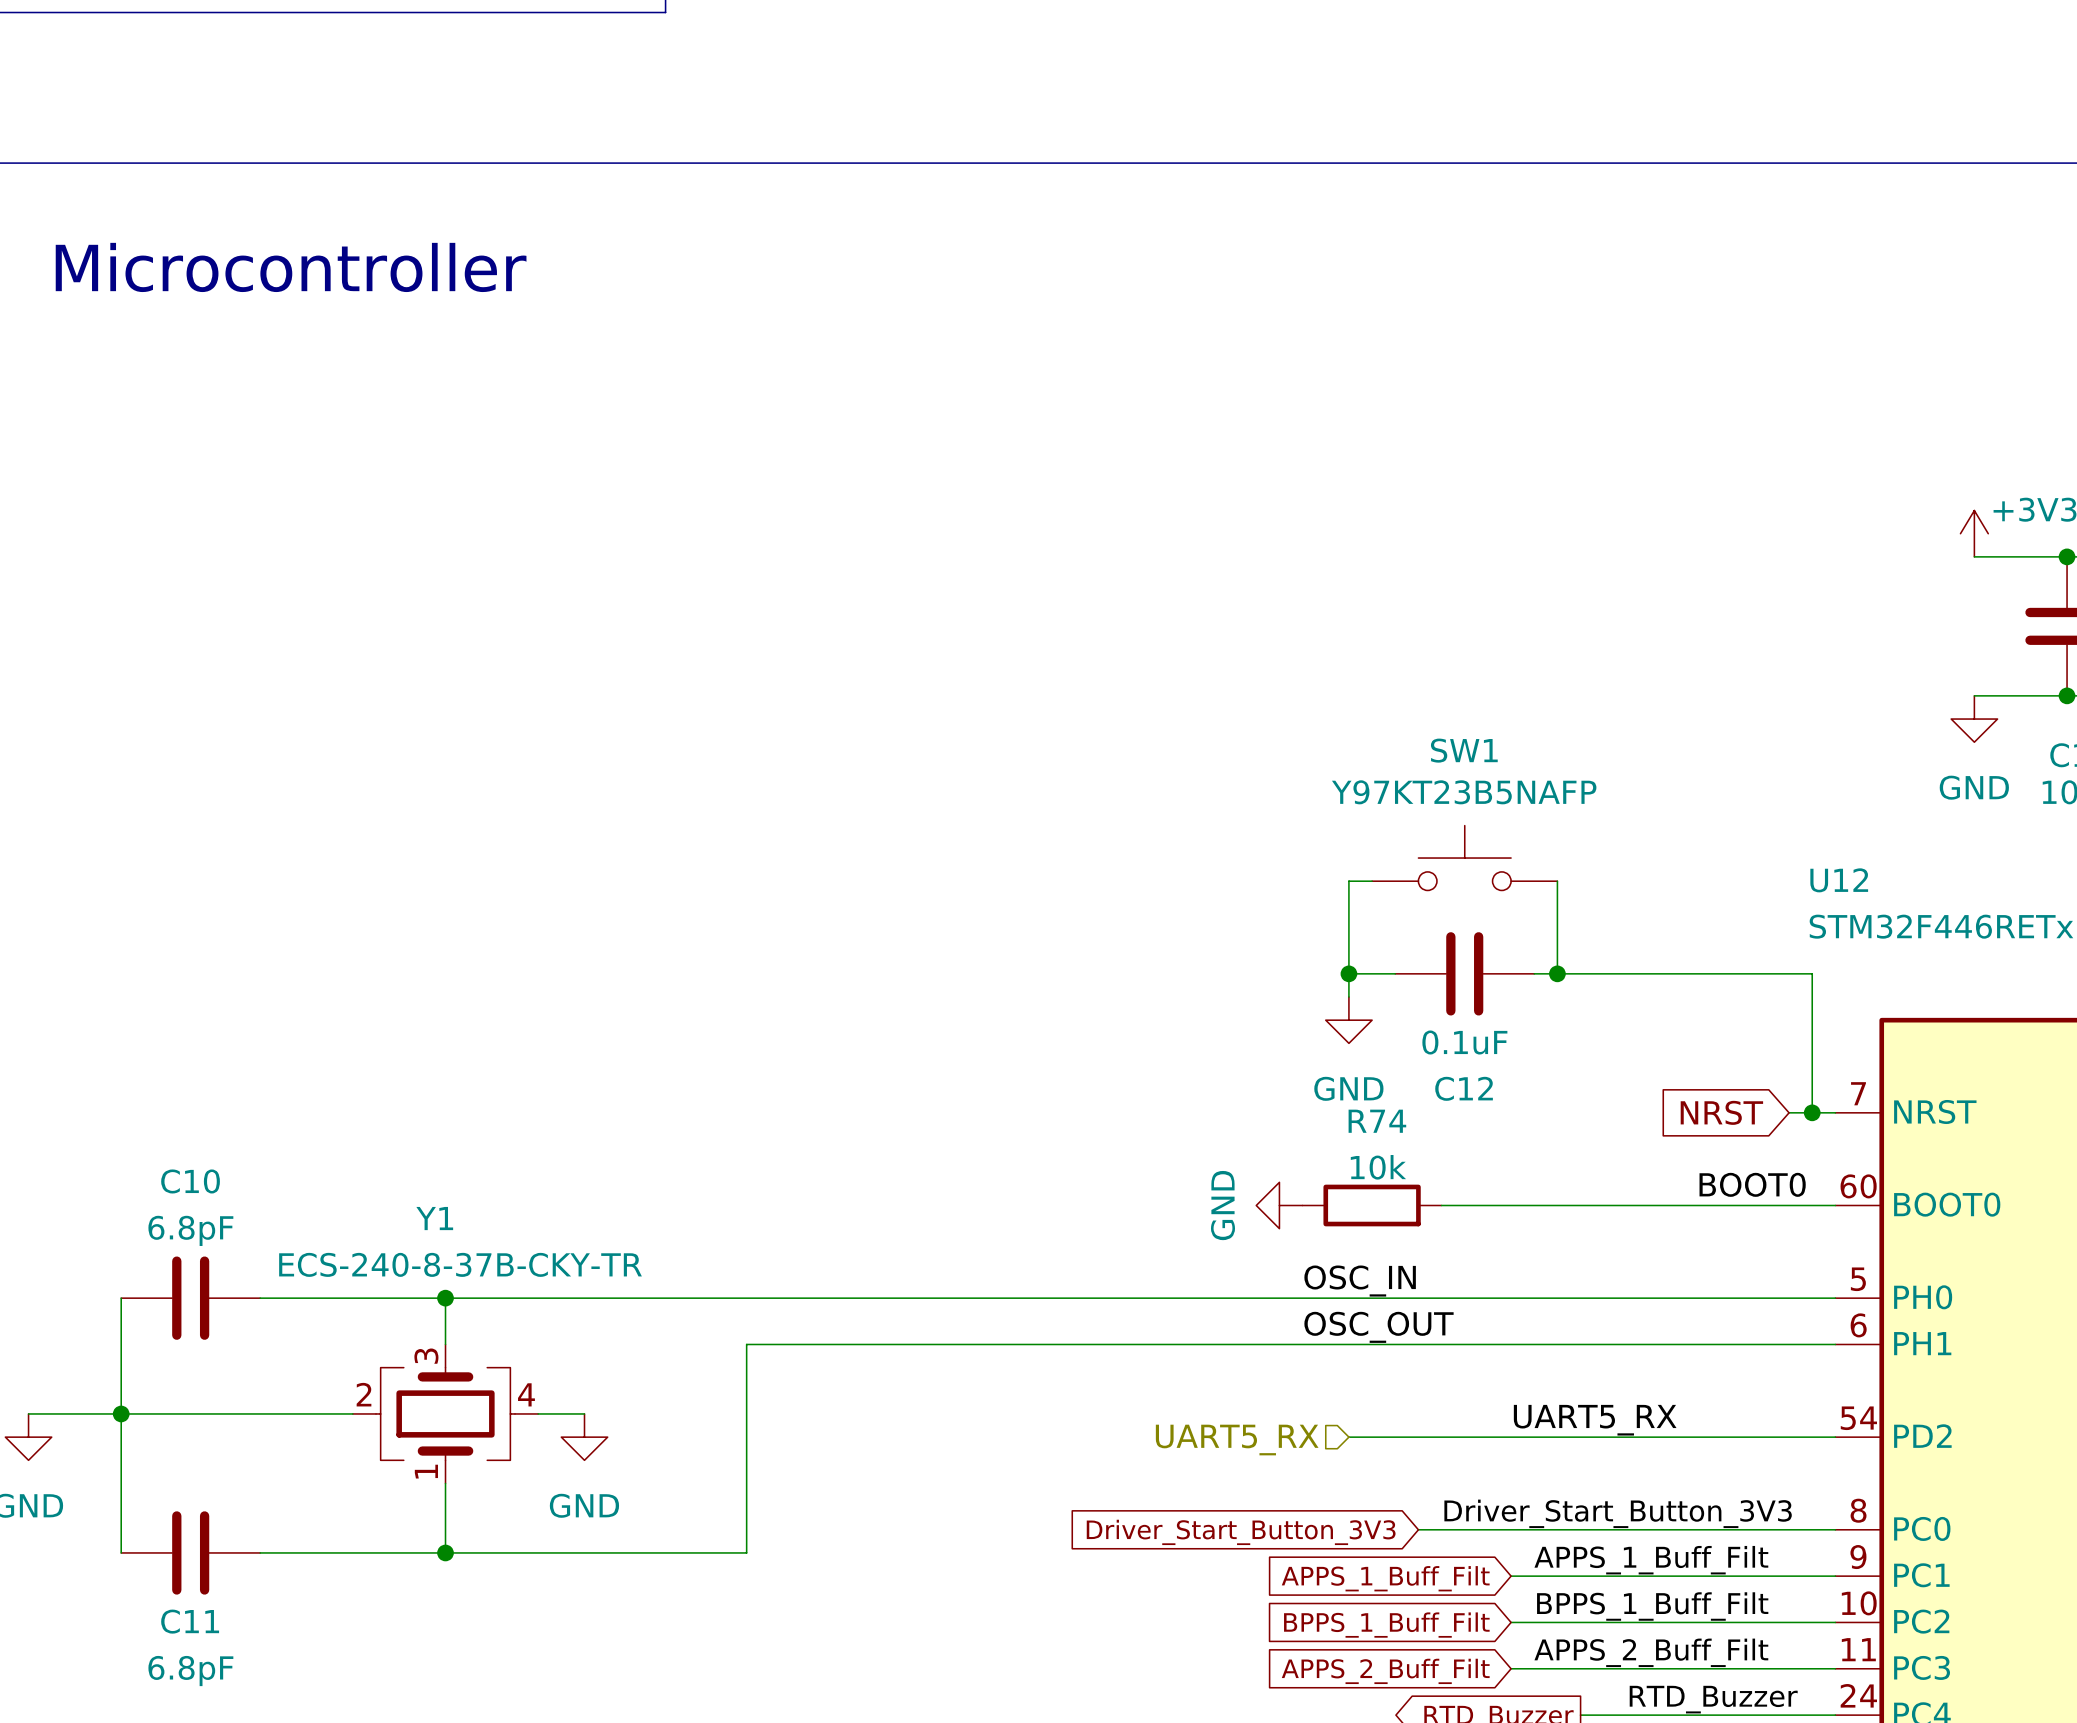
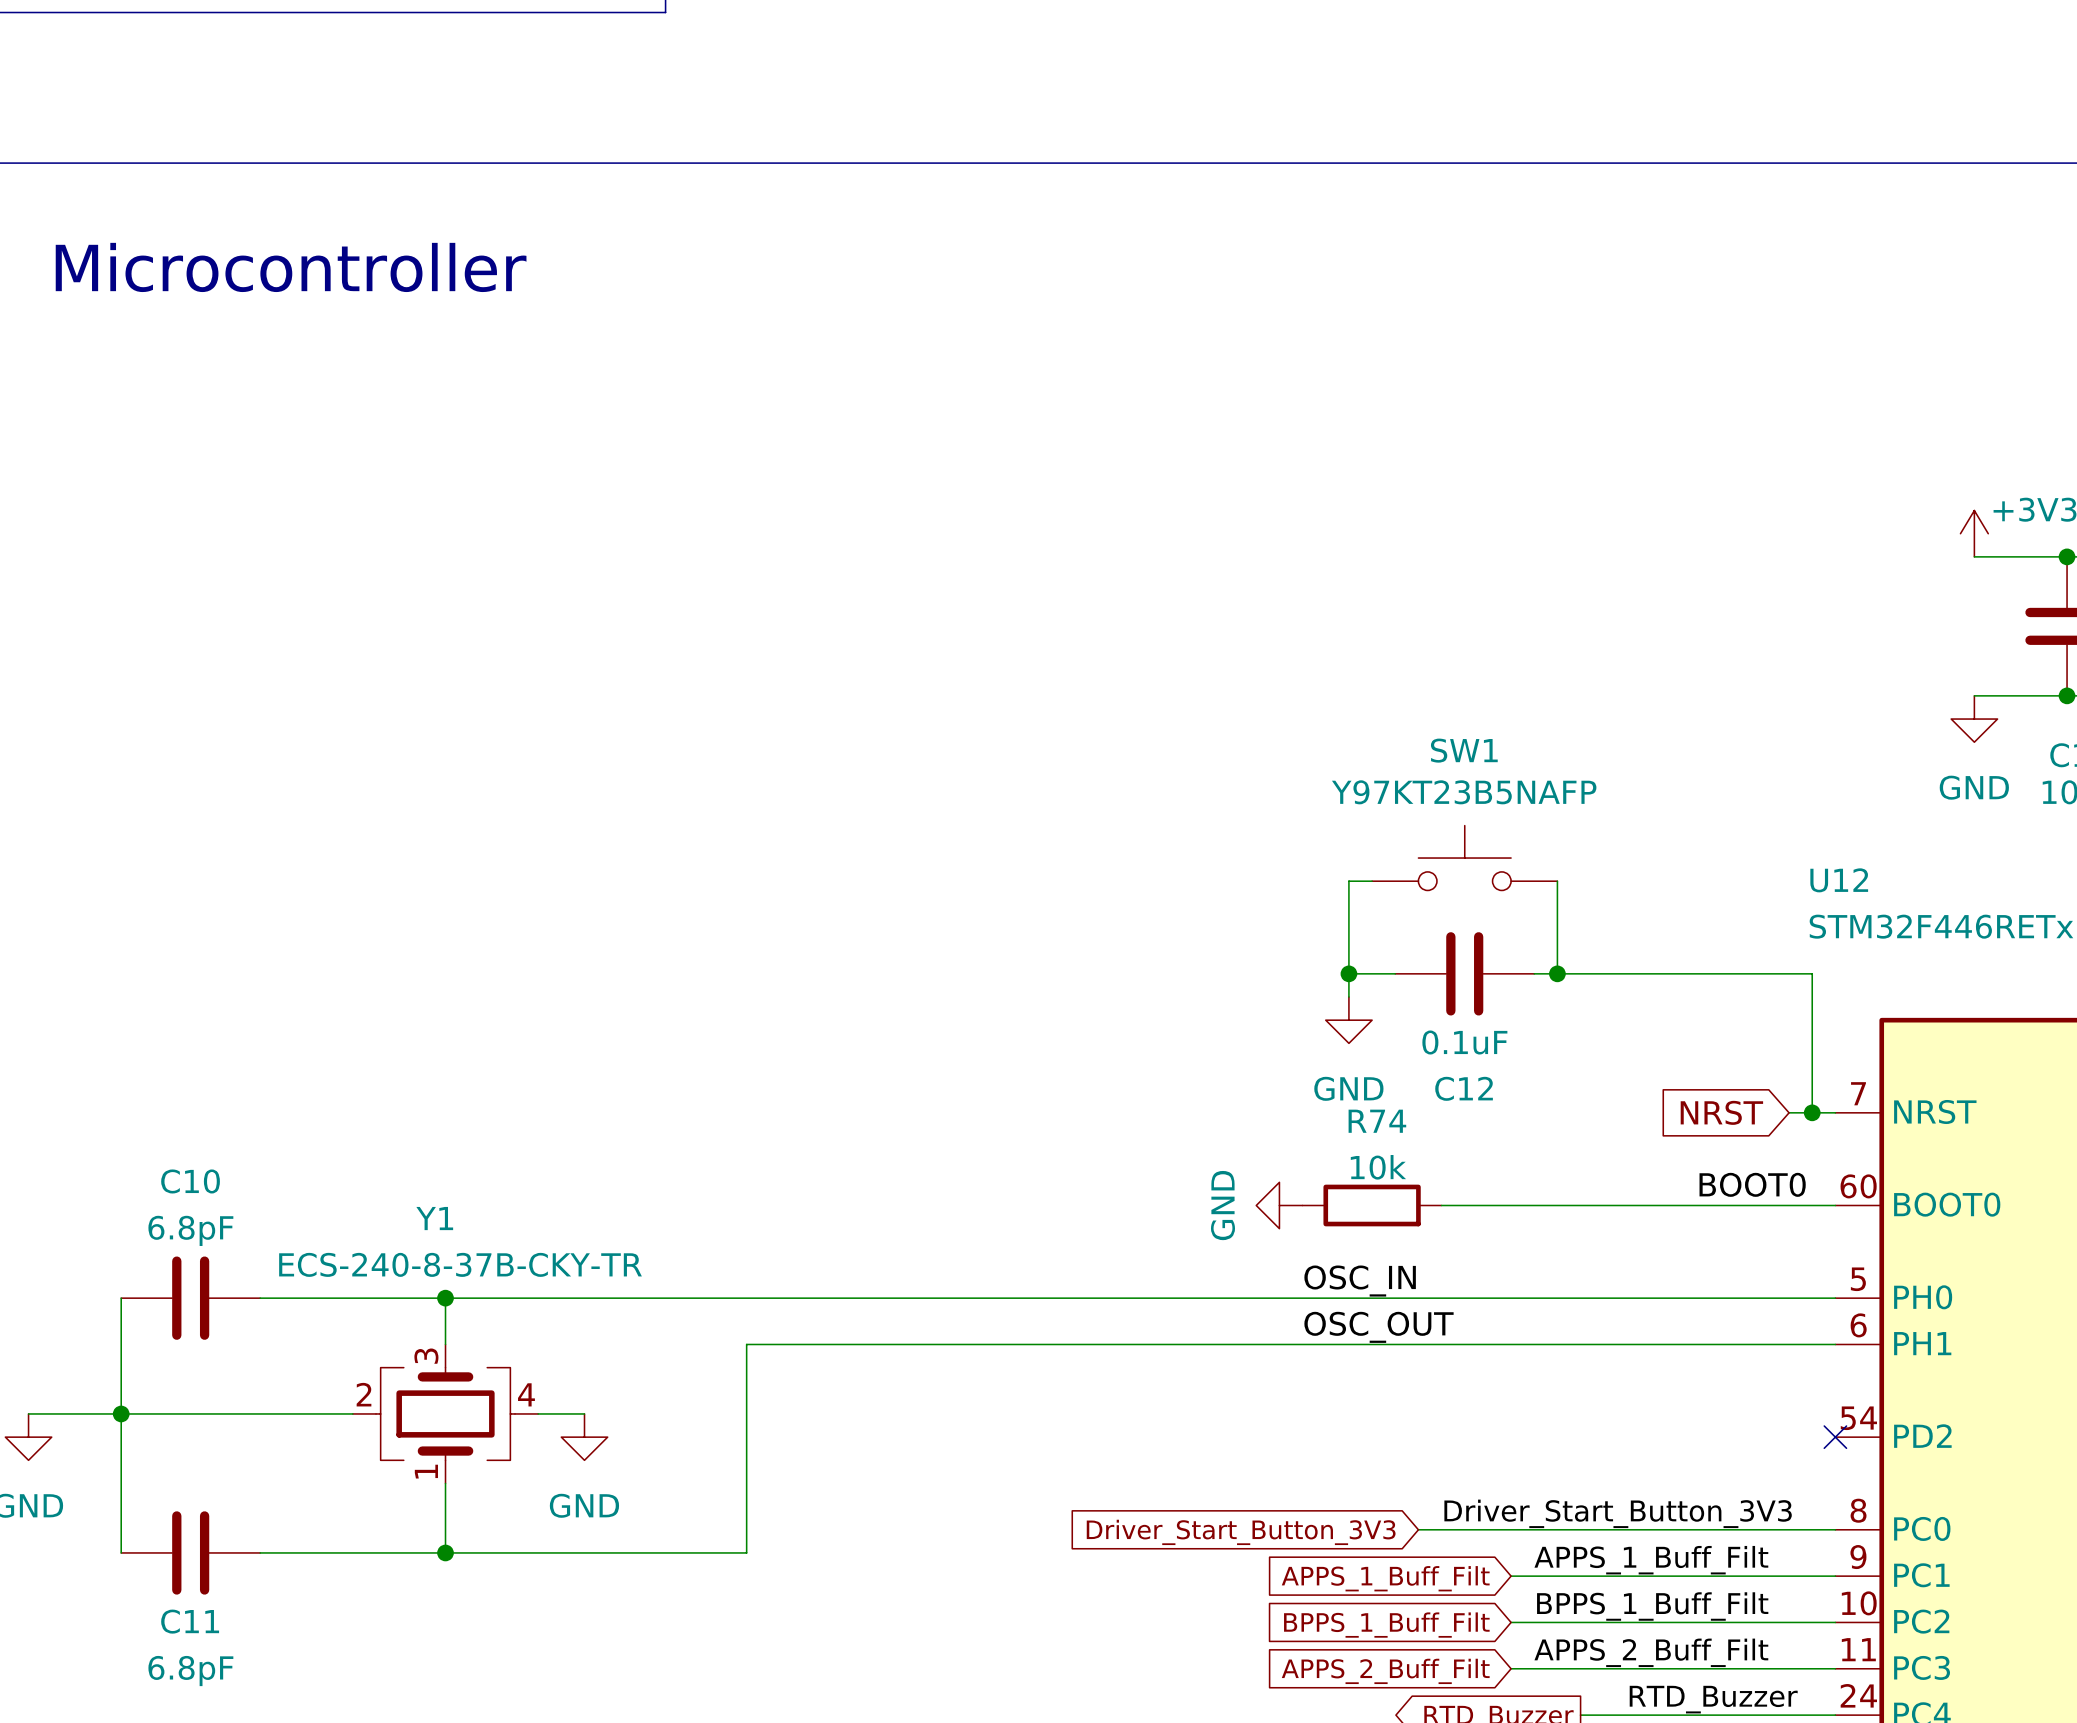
label: UART5_RX (1595, 1420) -> none
wire: (1348, 1437) (1835, 1437) -> none
no-connect mark: none -> (1835, 1437)
hierarchical label: UART5_RX (1237, 1440) -> none

